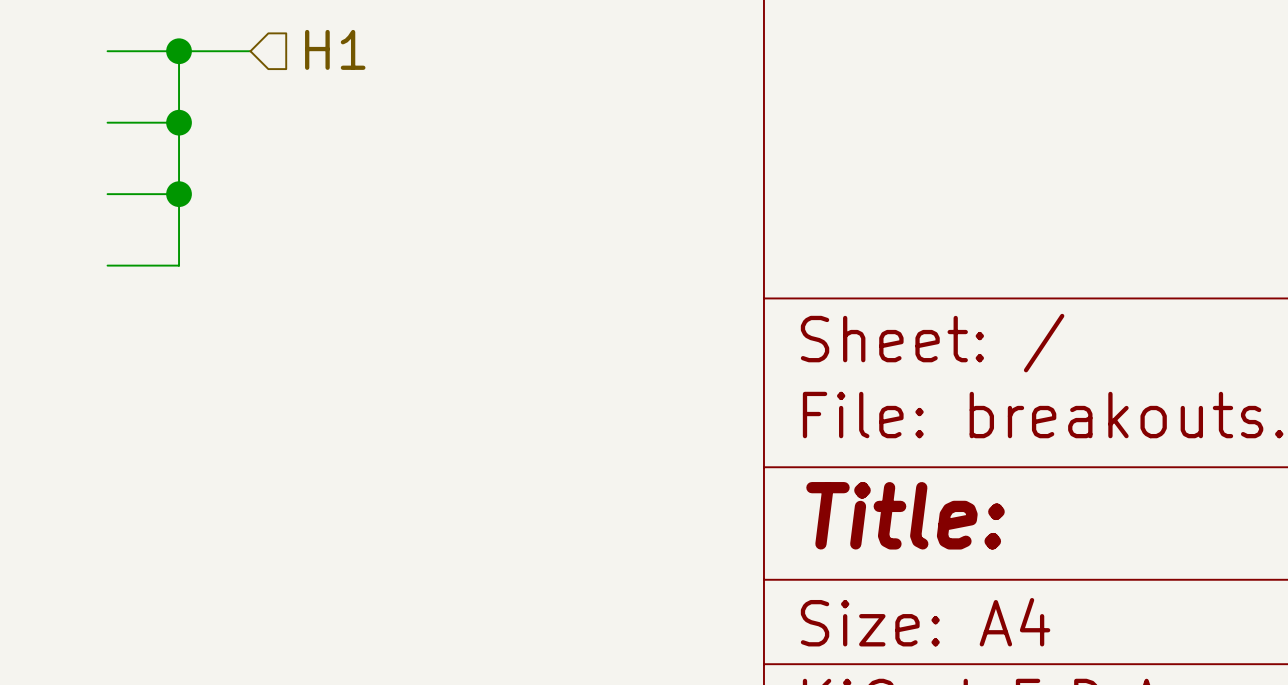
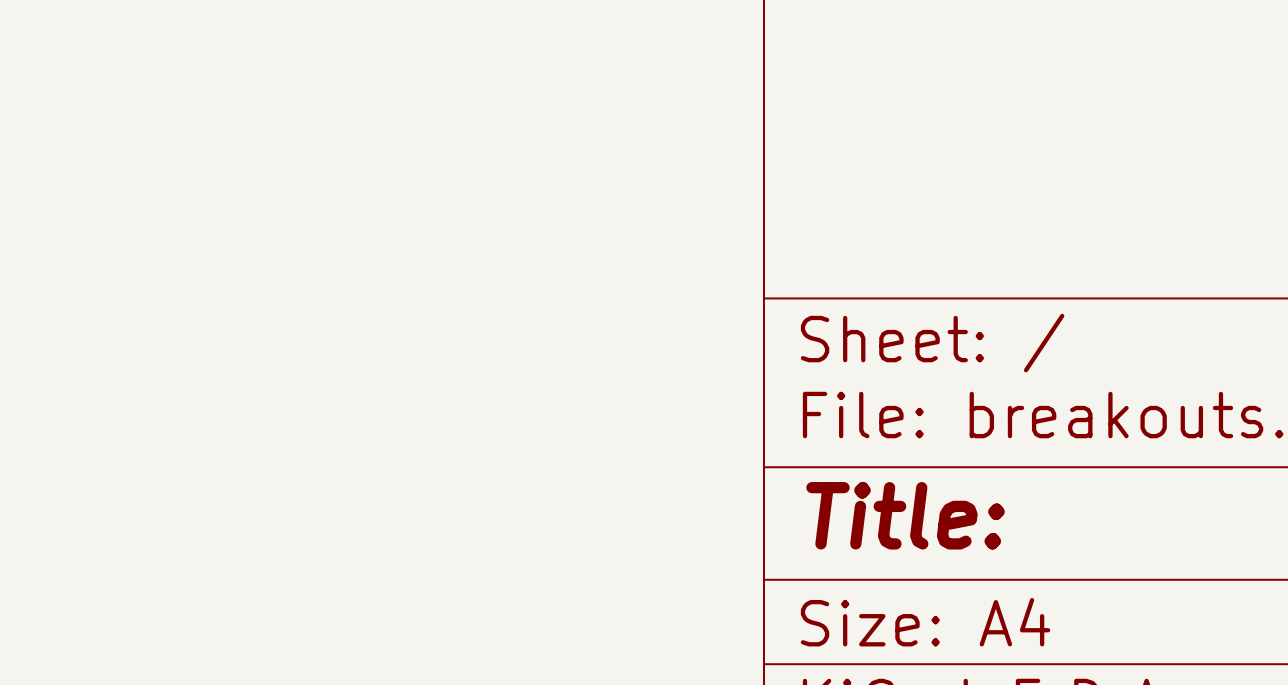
hierarchical label: H1 (335, 49) -> none
wire: (107, 51) (250, 51) -> none
wire: (179, 51) (179, 265) (107, 265) -> none
junction: (179, 51) -> none
wire: (107, 122) (179, 122) -> none
junction: (179, 122) -> none
wire: (107, 194) (179, 194) -> none
junction: (179, 194) -> none

